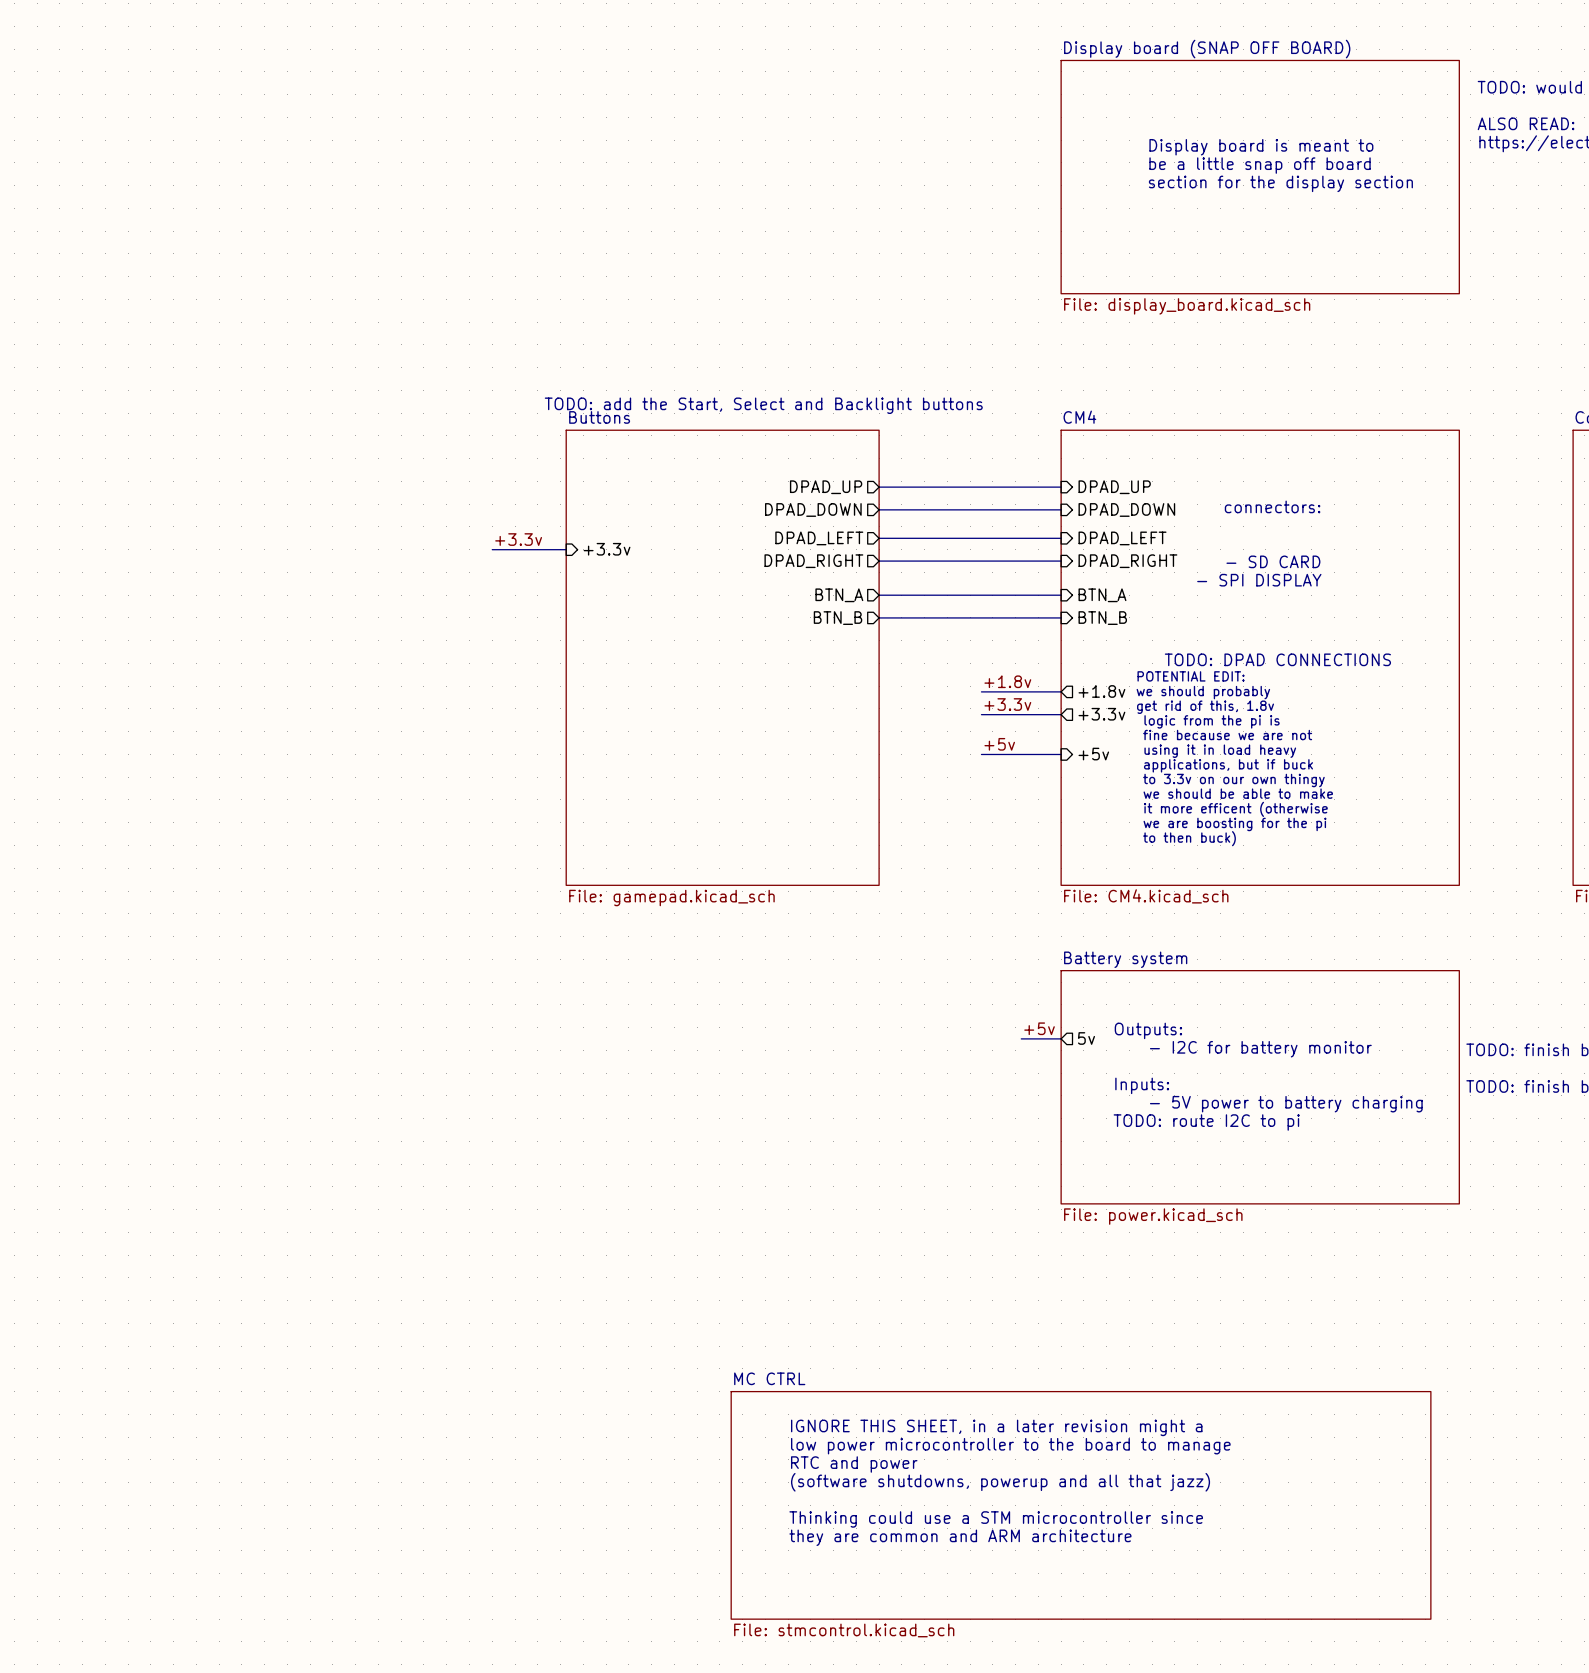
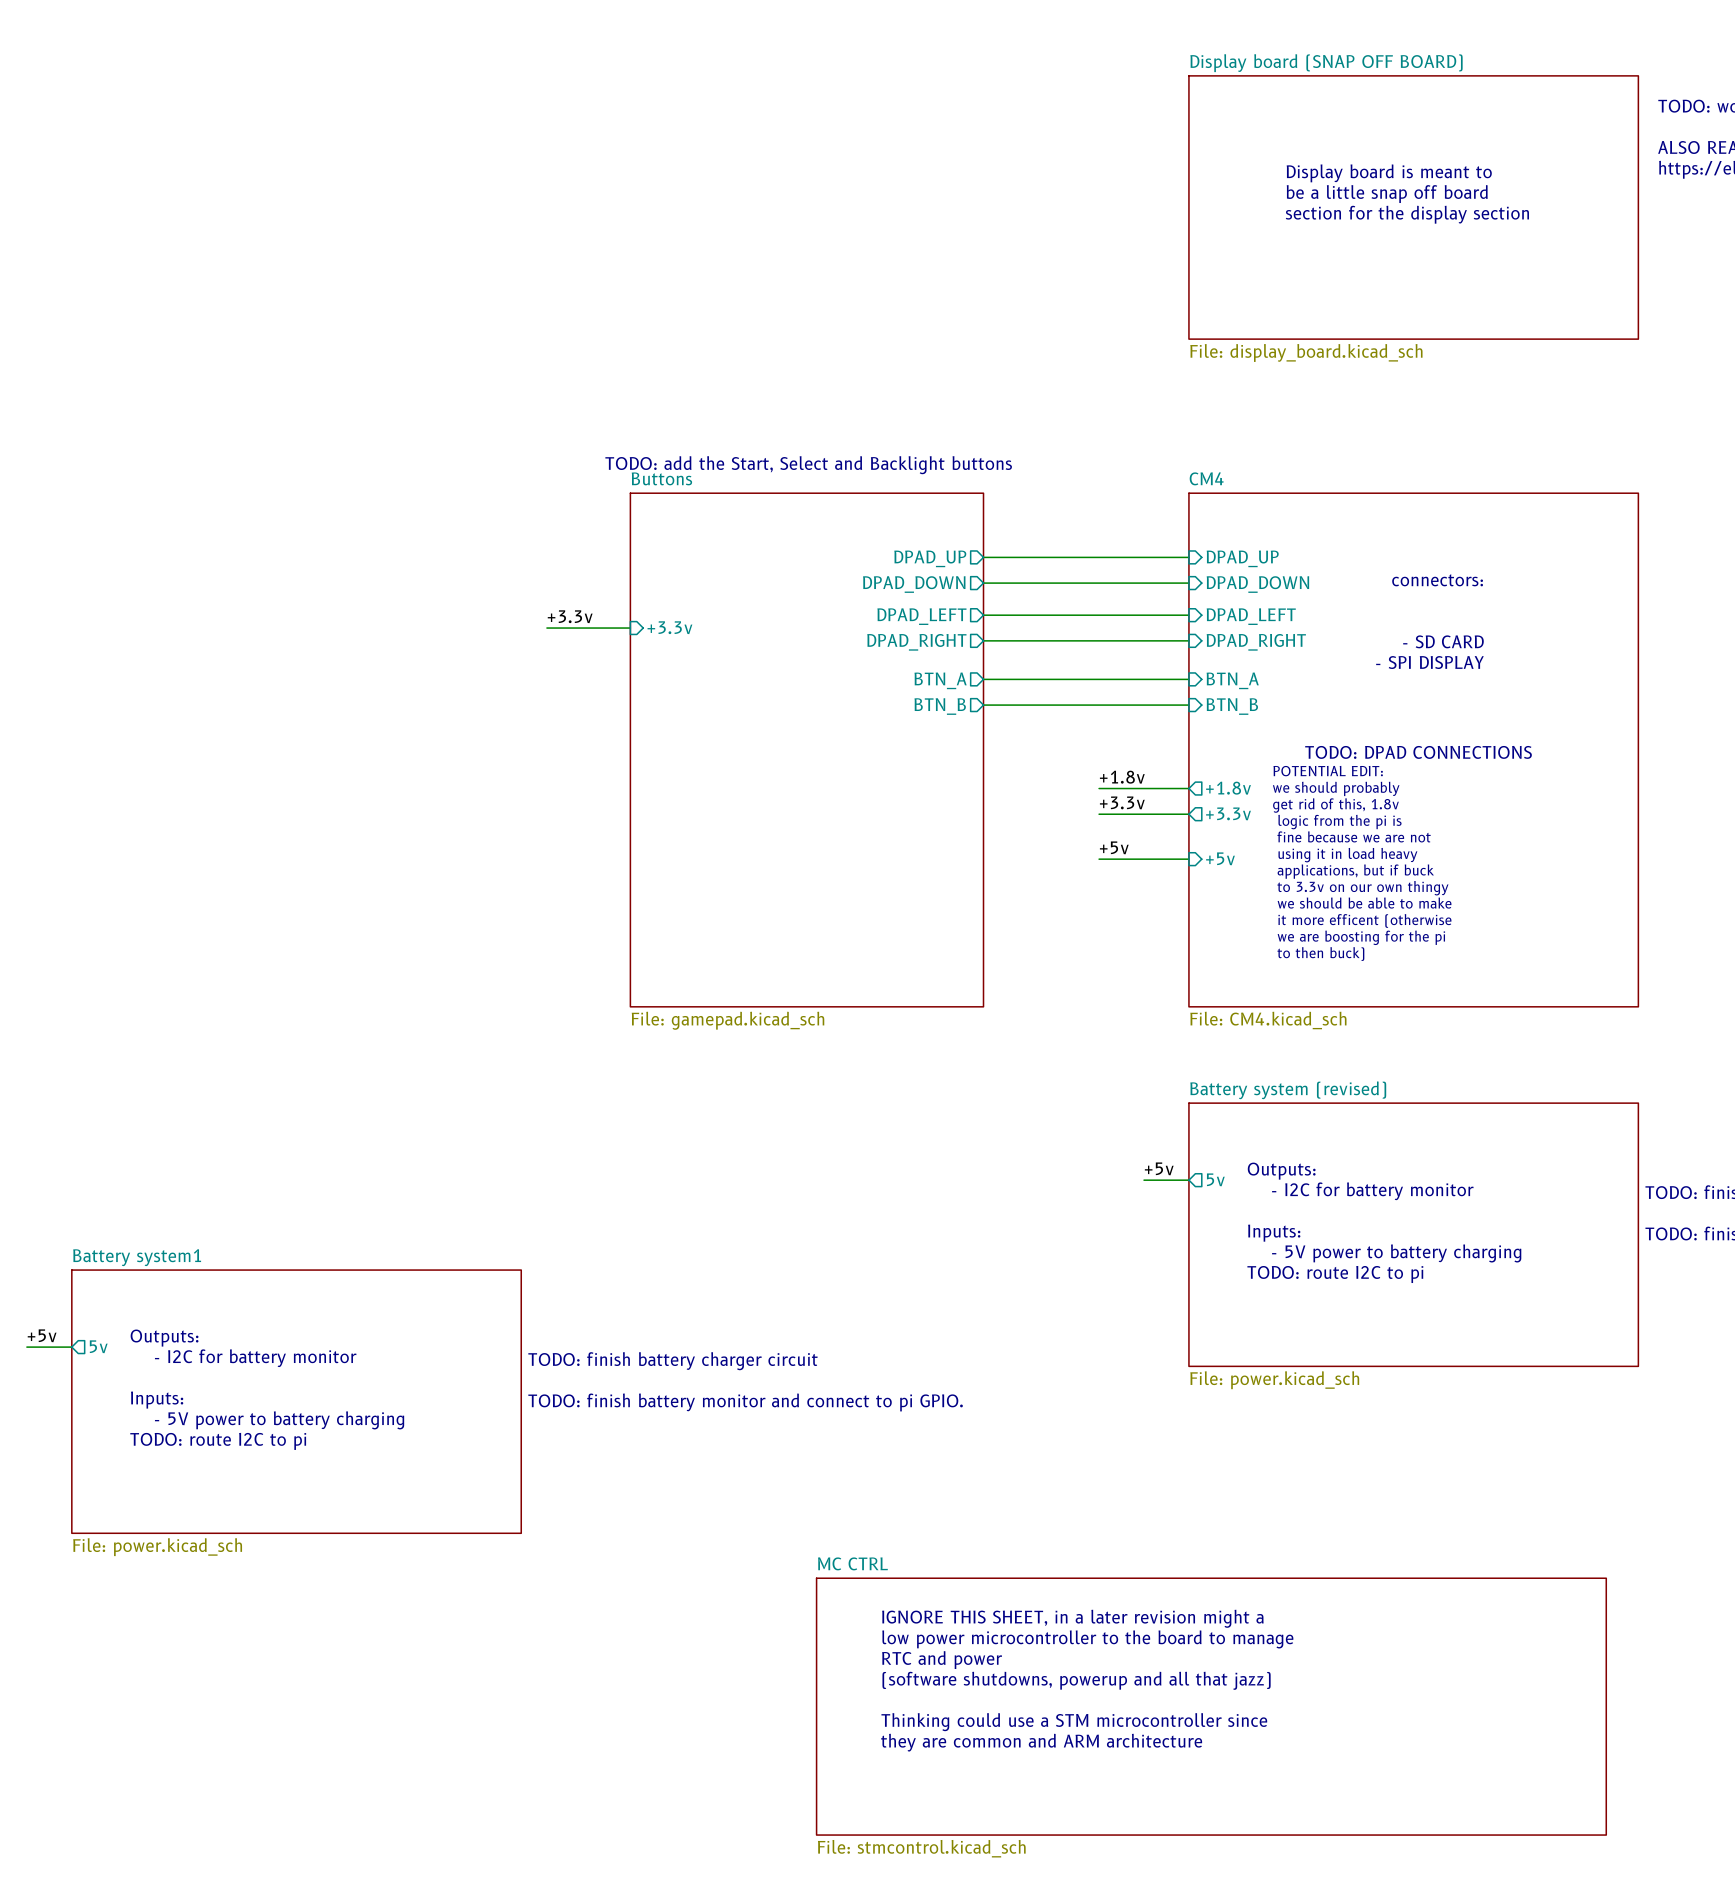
sheet Battery system name: Battery system (1125, 959) -> Battery system (revised) (1288, 1090)
label: none -> +5v (42, 1335)
text: none -> Outputs: (164, 1338)
wire: none -> (26, 1347) (71, 1347)
sheet pin: none -> 5v (98, 1346)
text: none -> - I2C for battery monitor (255, 1358)
text: none -> TODO: finish battery charger circuit (672, 1361)
text: none -> Inputs: (157, 1400)
sheet Battery system1: none -> File: power.kicad_sch (296, 1401)
text: none -> TODO: finish battery monitor and connect to pi GPIO. (745, 1402)
text: none -> - 5V power to battery charging (279, 1420)
text: none -> TODO: route I2C to pi (218, 1441)

